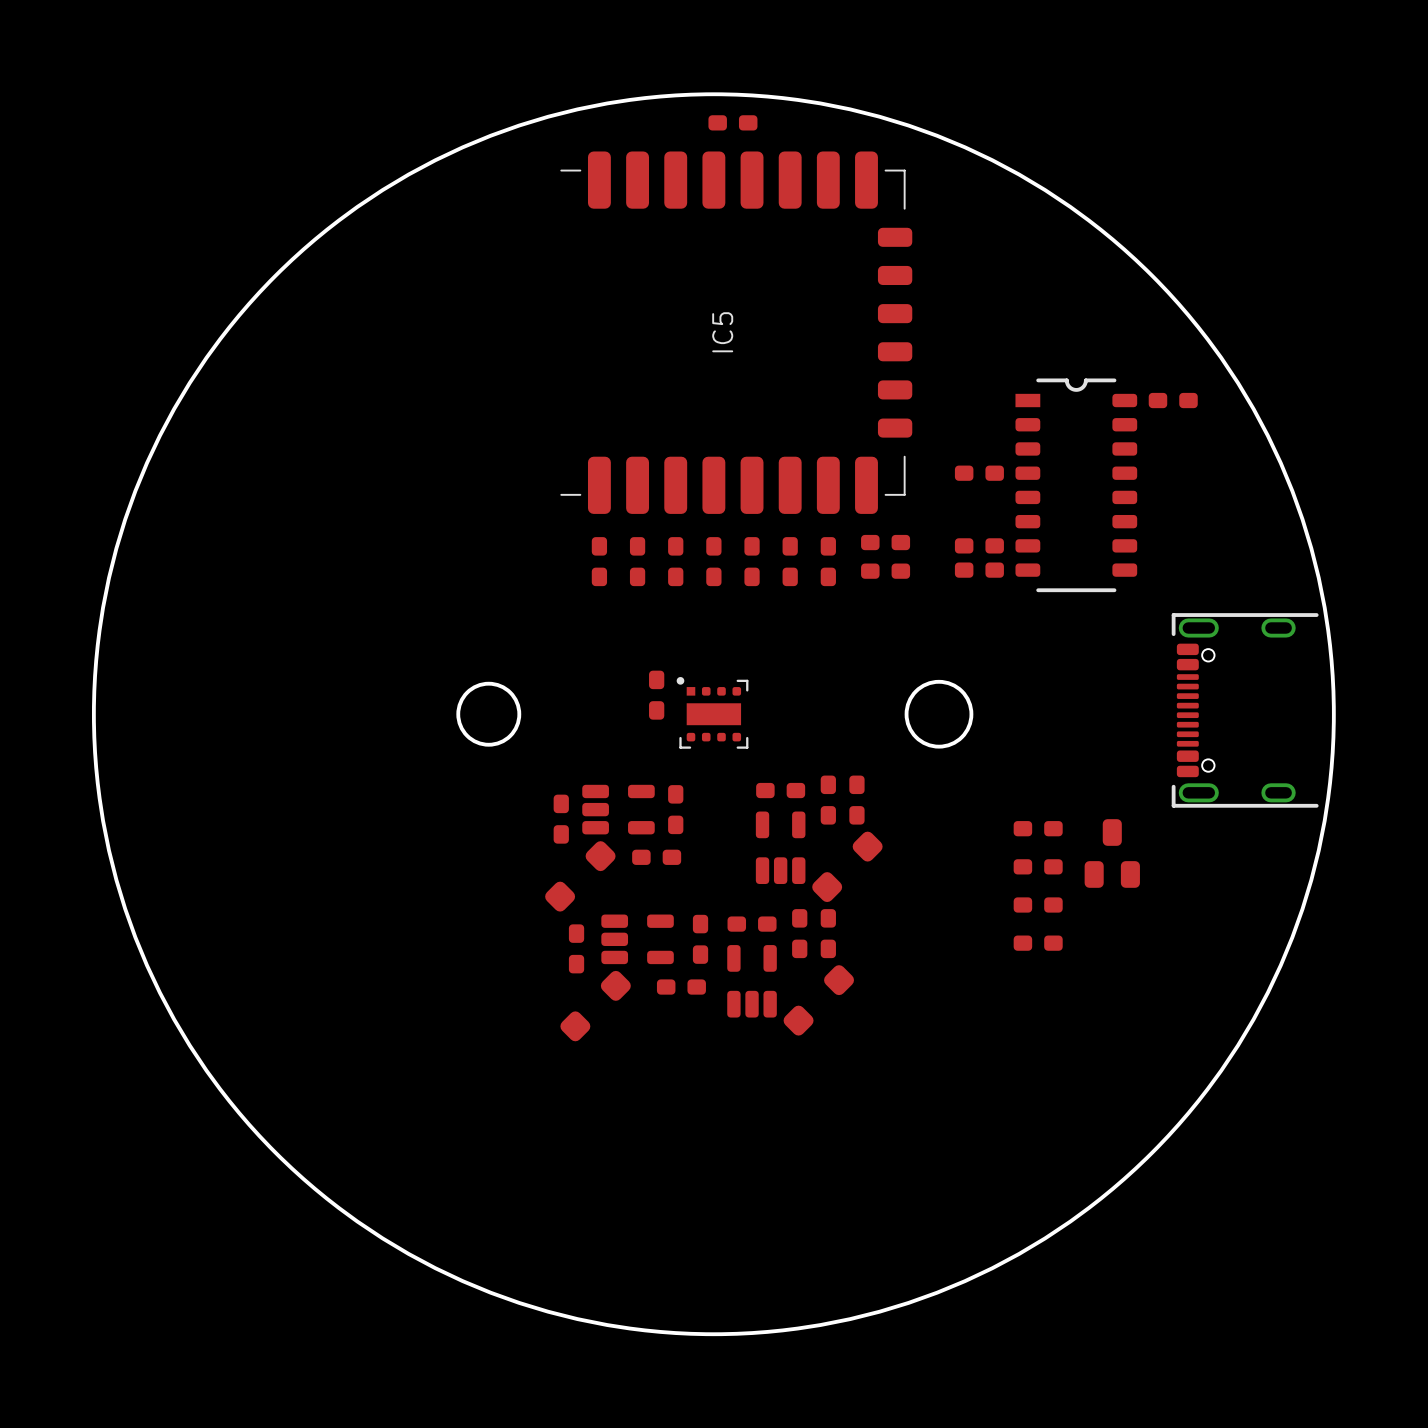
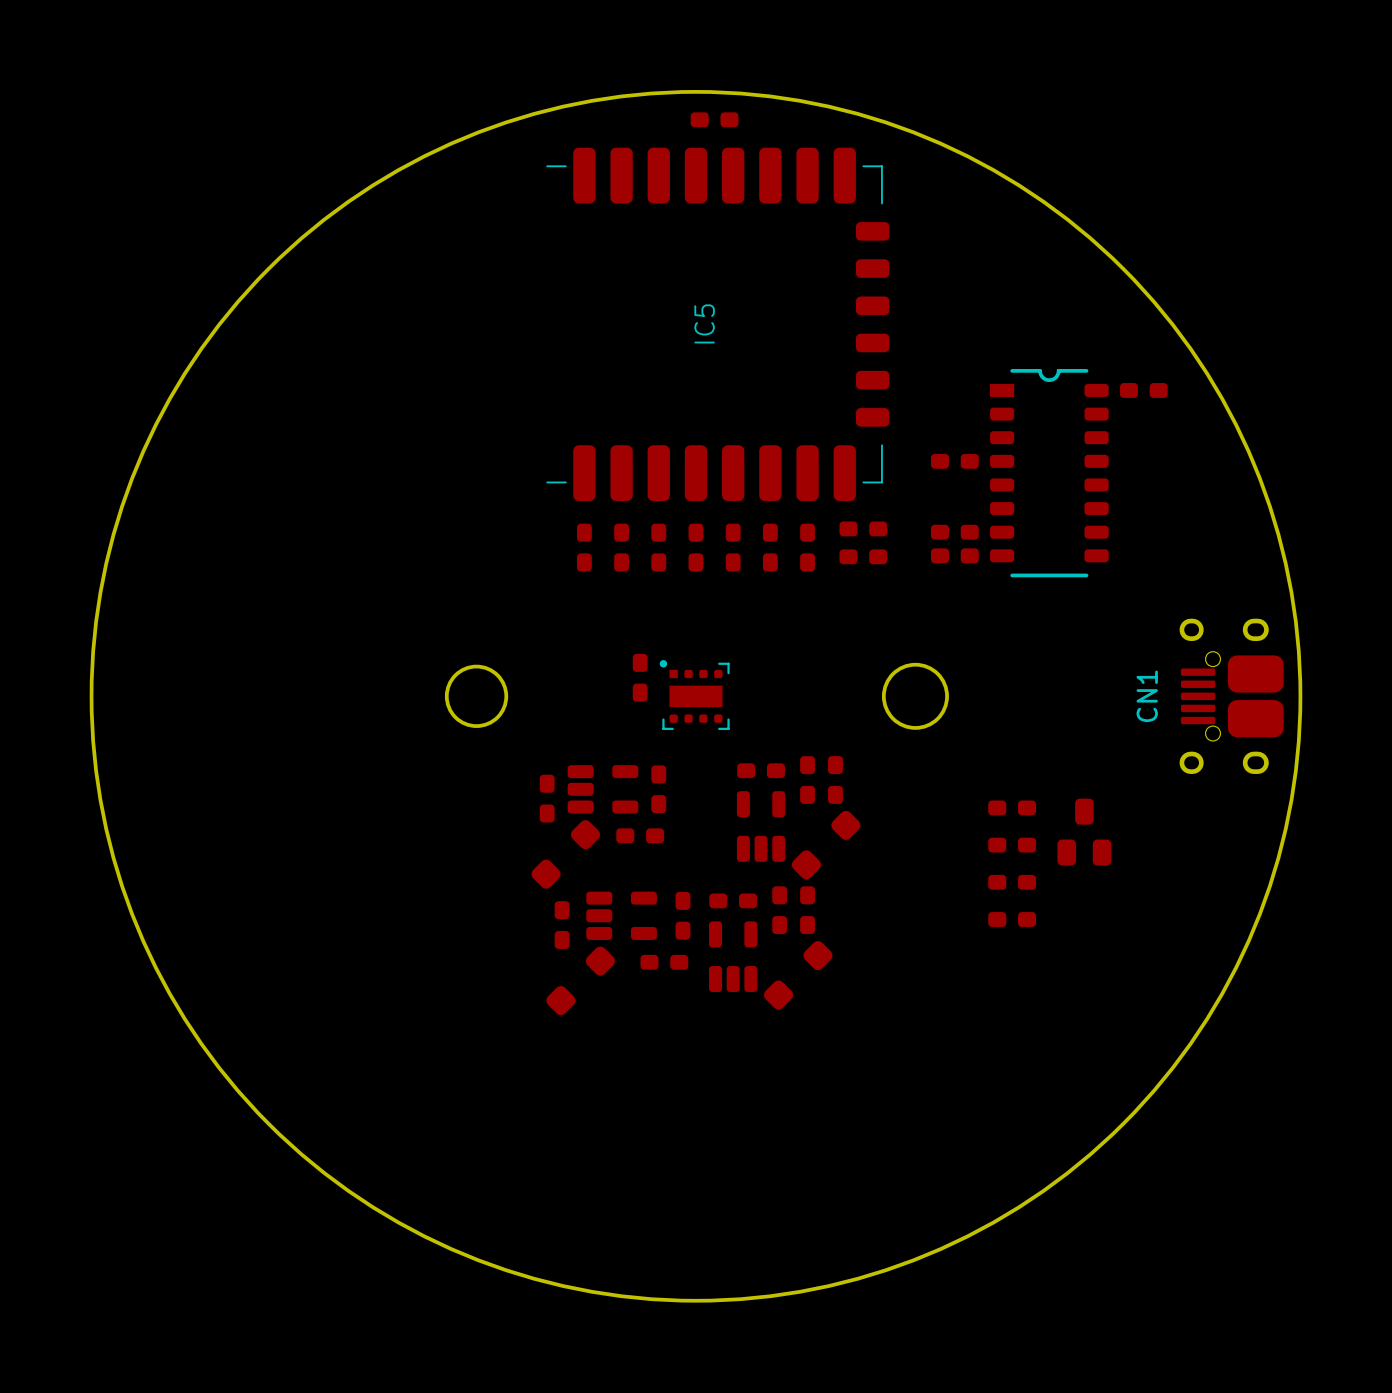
part: (1245, 710) -> none
CN1: none -> (1231, 696)

